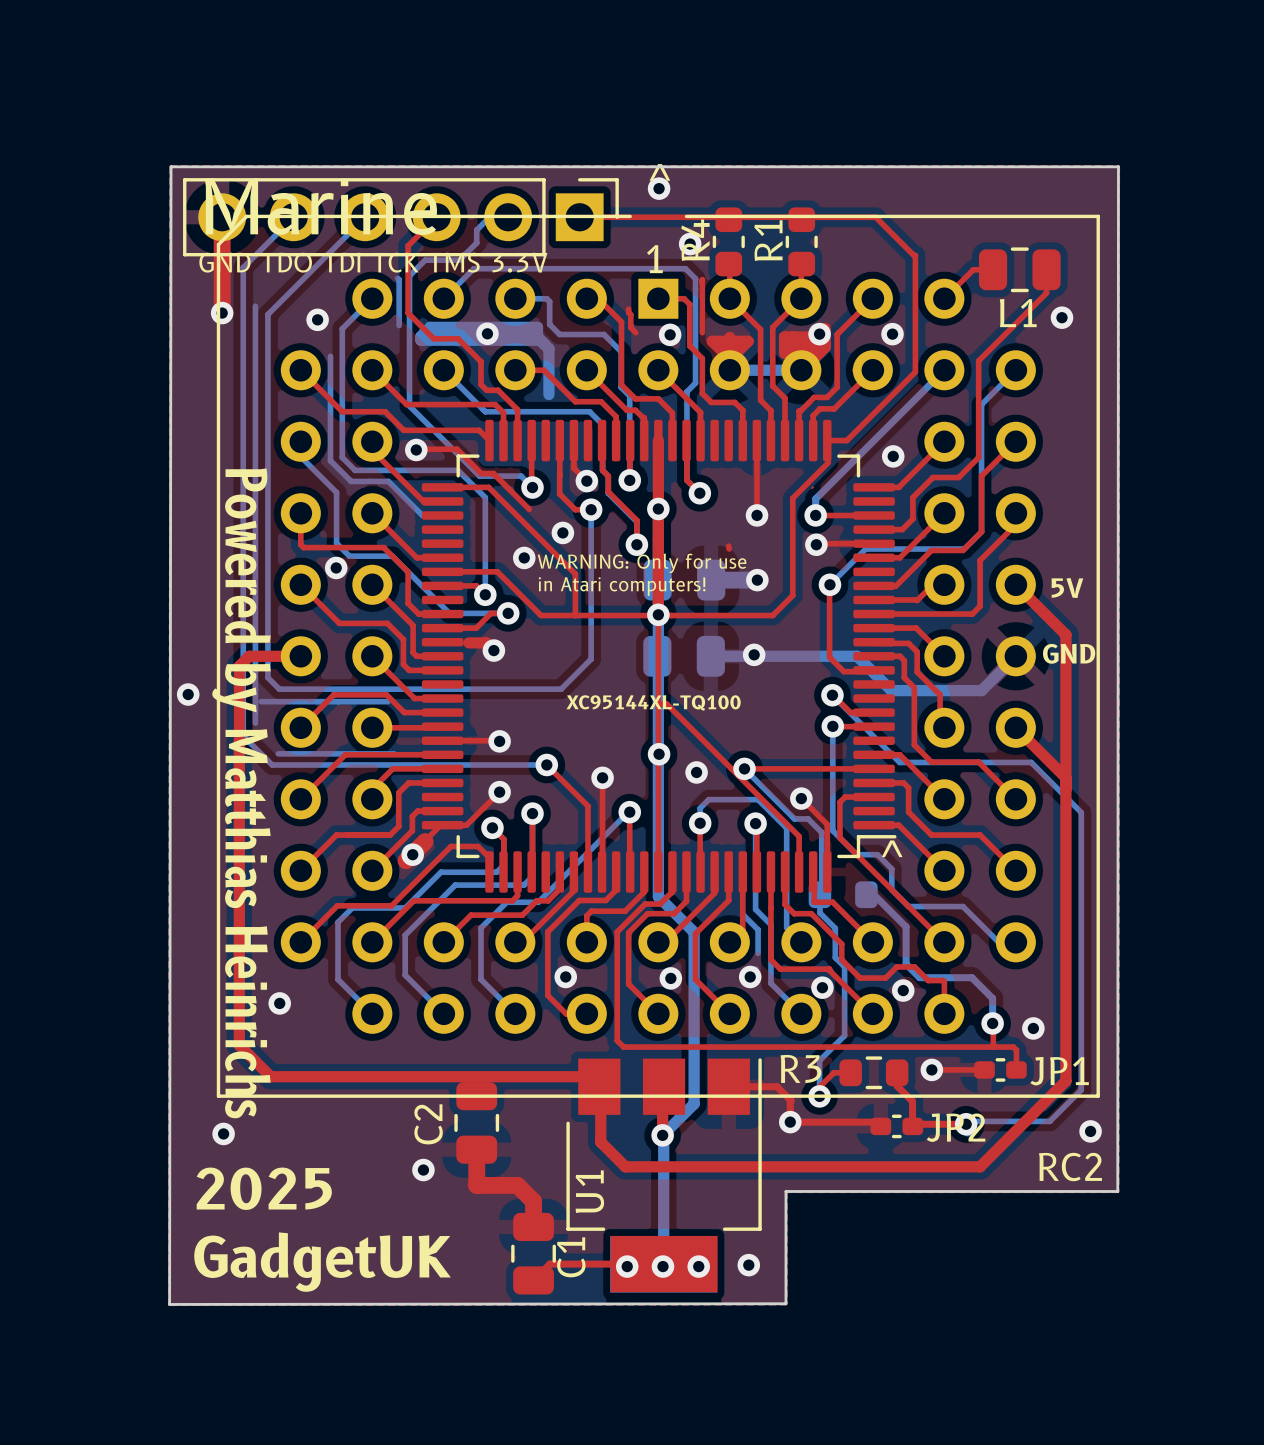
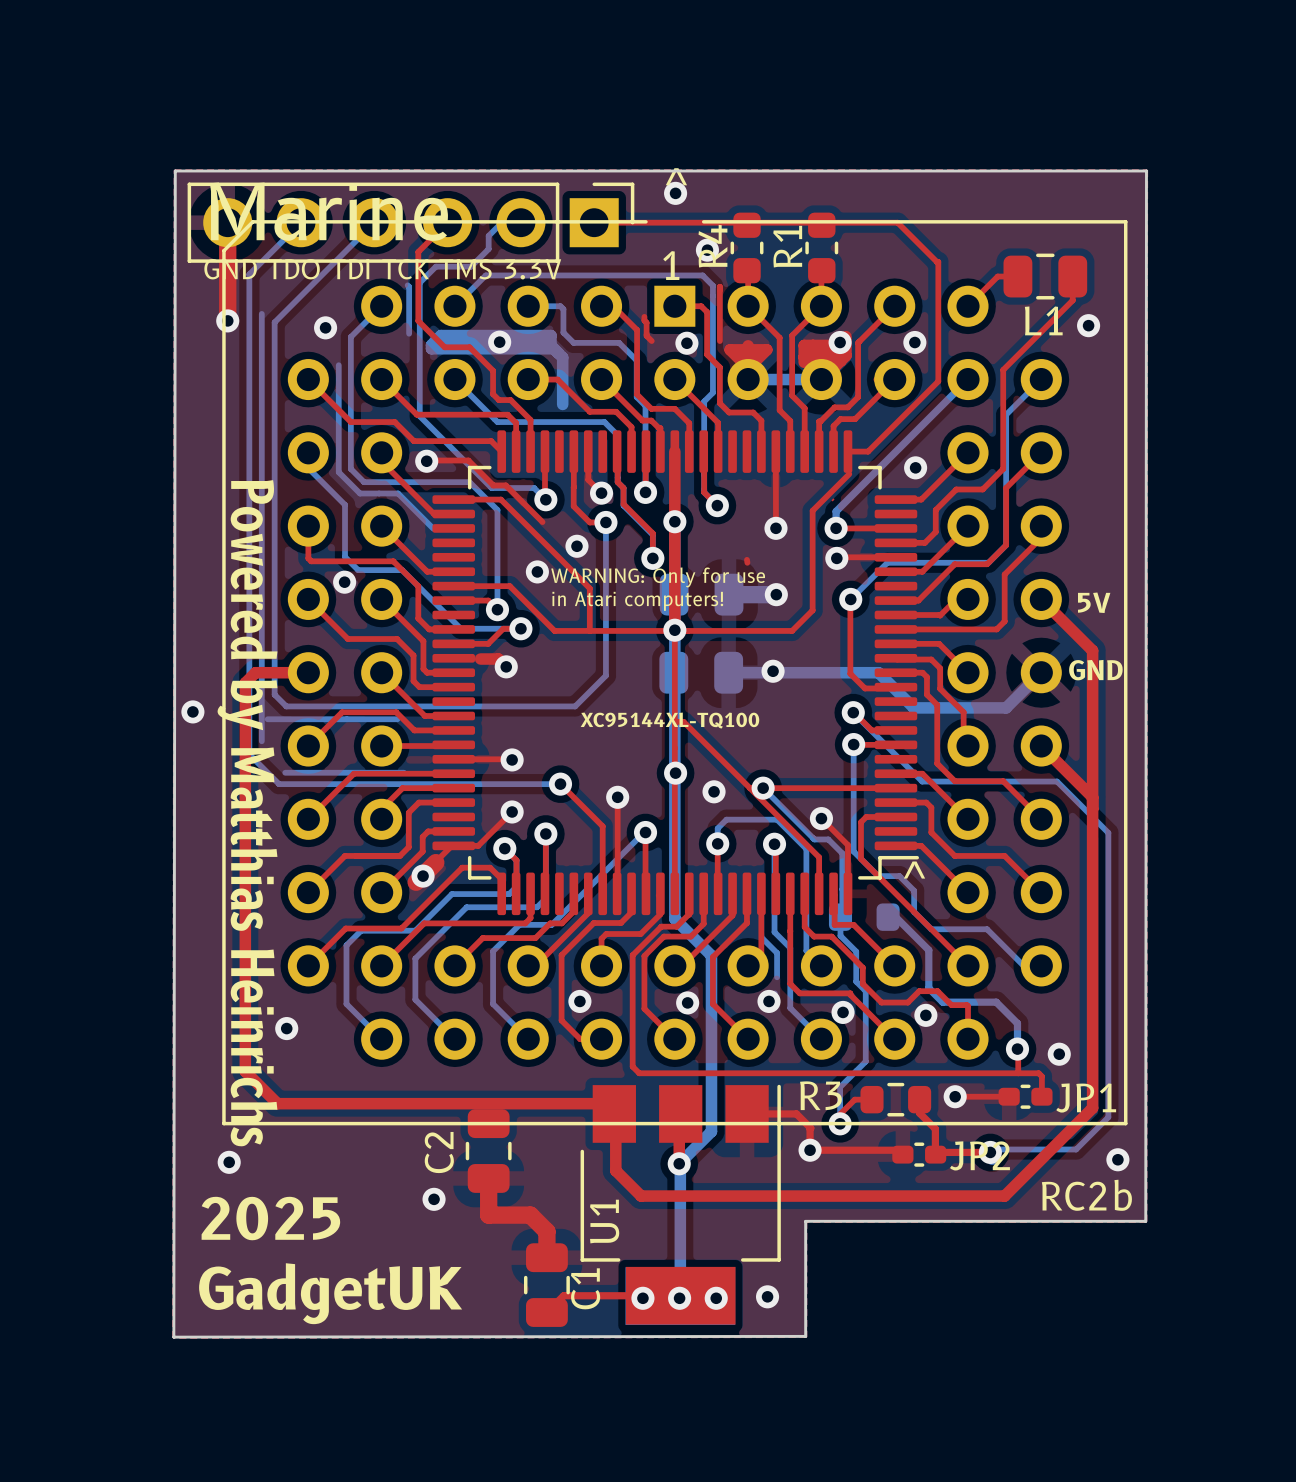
text: RC2 (1070, 1167) -> RC2b (1086, 1195)

